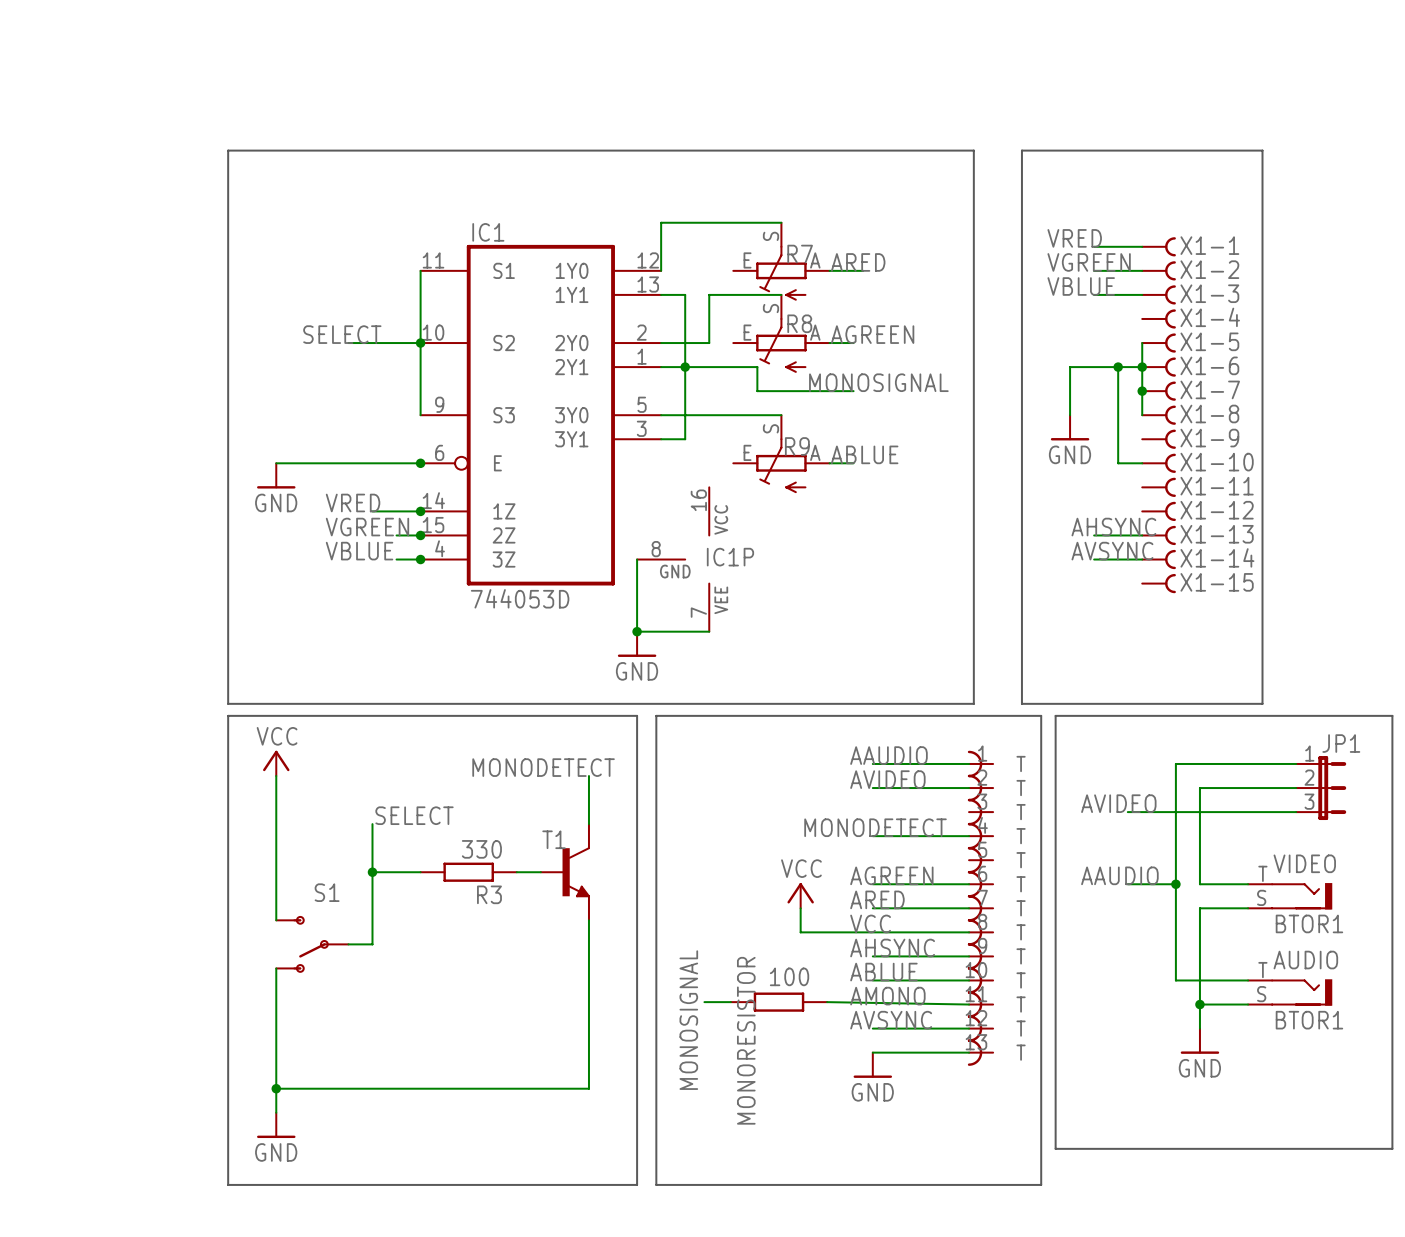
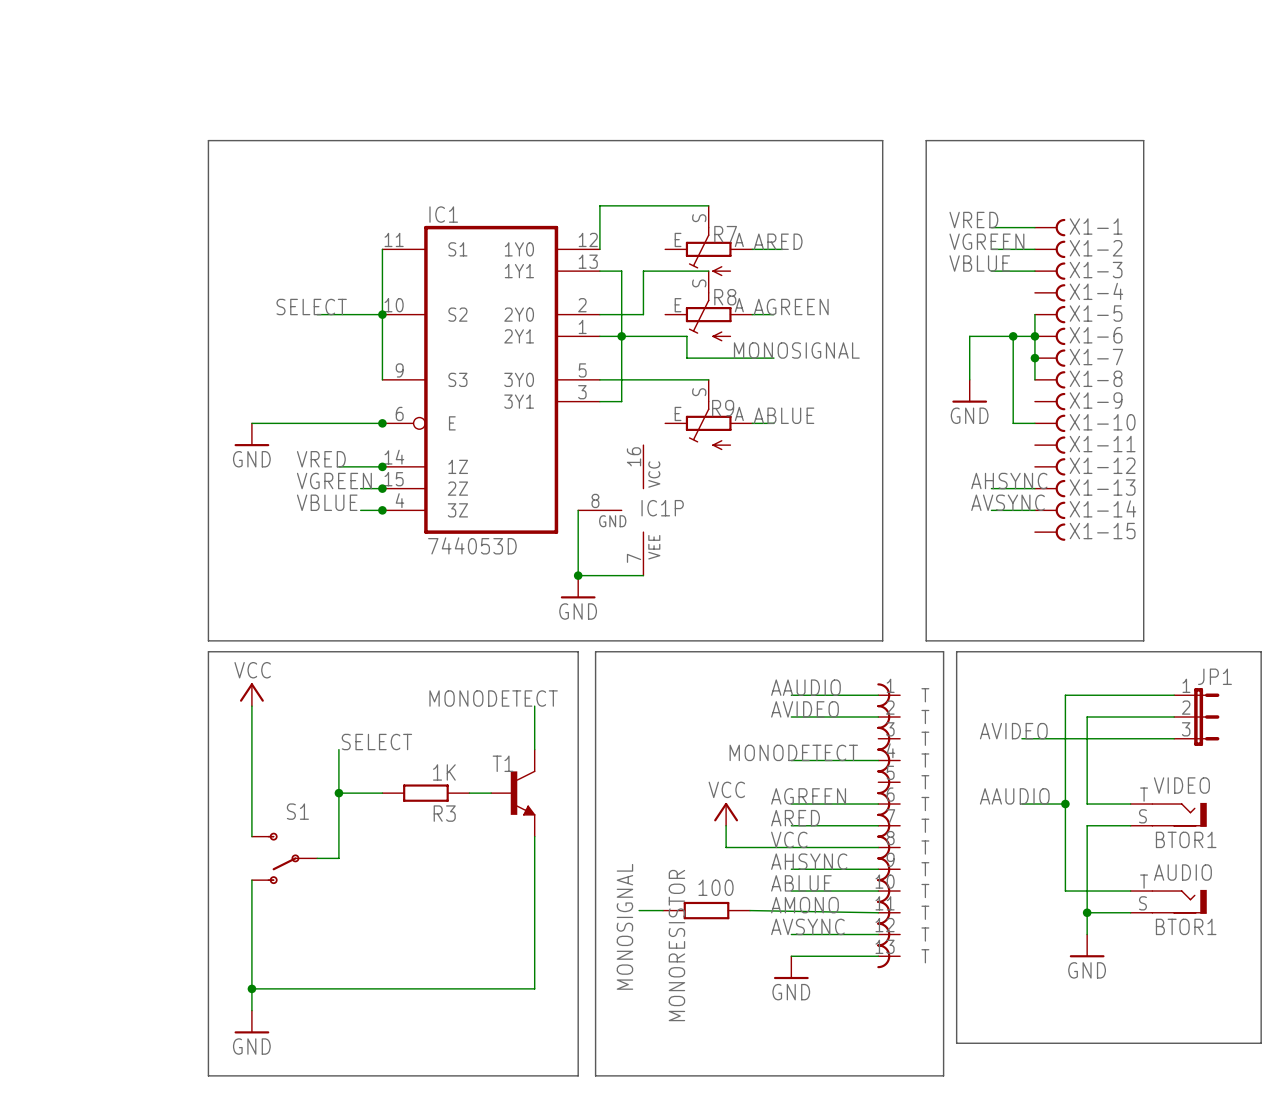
R3 value: 330 (481, 849) -> 1K (444, 772)

